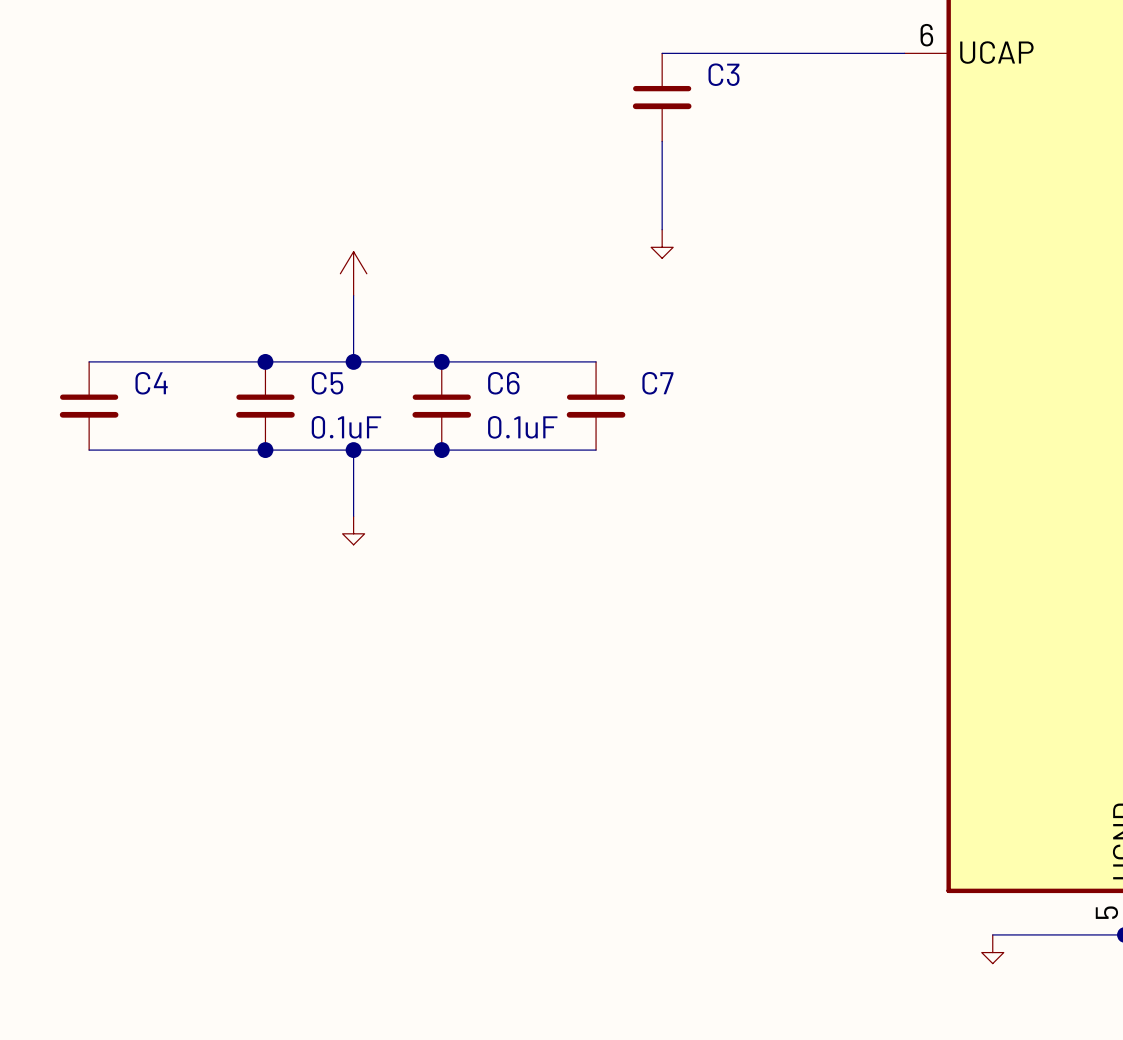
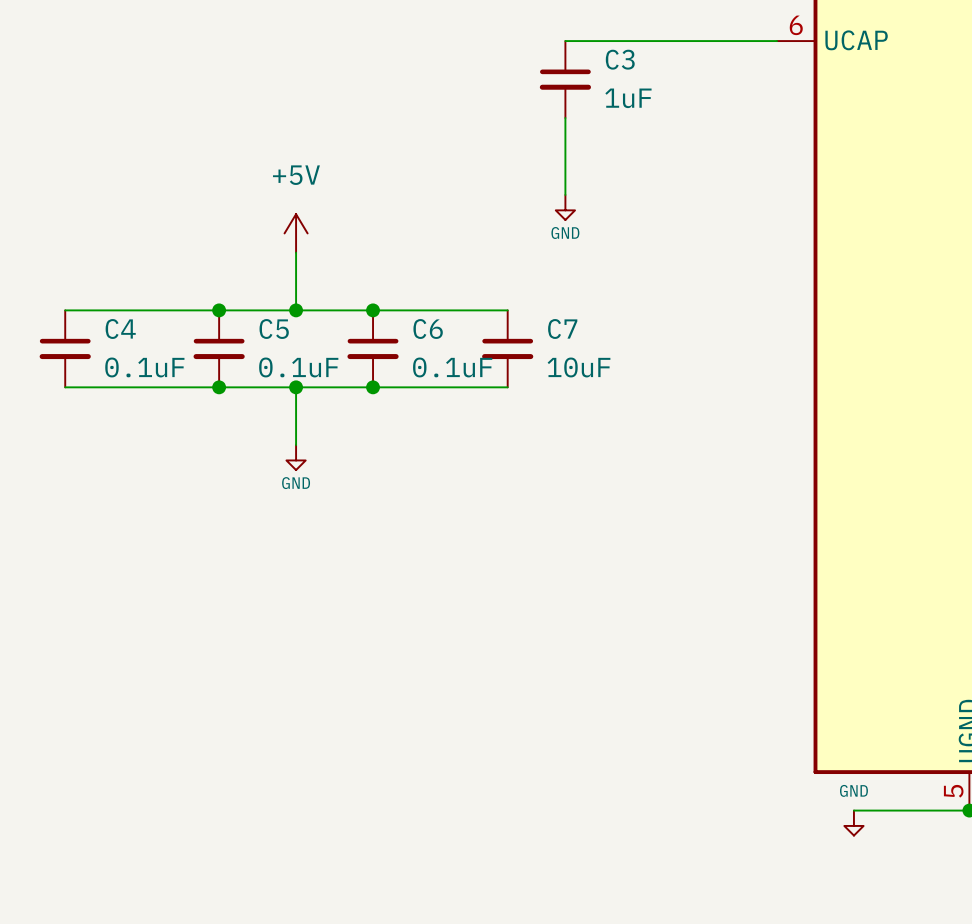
C3 value: none -> 1uF (628, 98)
power symbol text: none -> +5V (296, 175)
power symbol text: none -> GND (565, 233)
C4 value: none -> 0.1uF (144, 367)
C7 value: none -> 10uF (579, 367)
power symbol text: none -> GND (296, 483)
power symbol text: none -> GND (853, 790)

